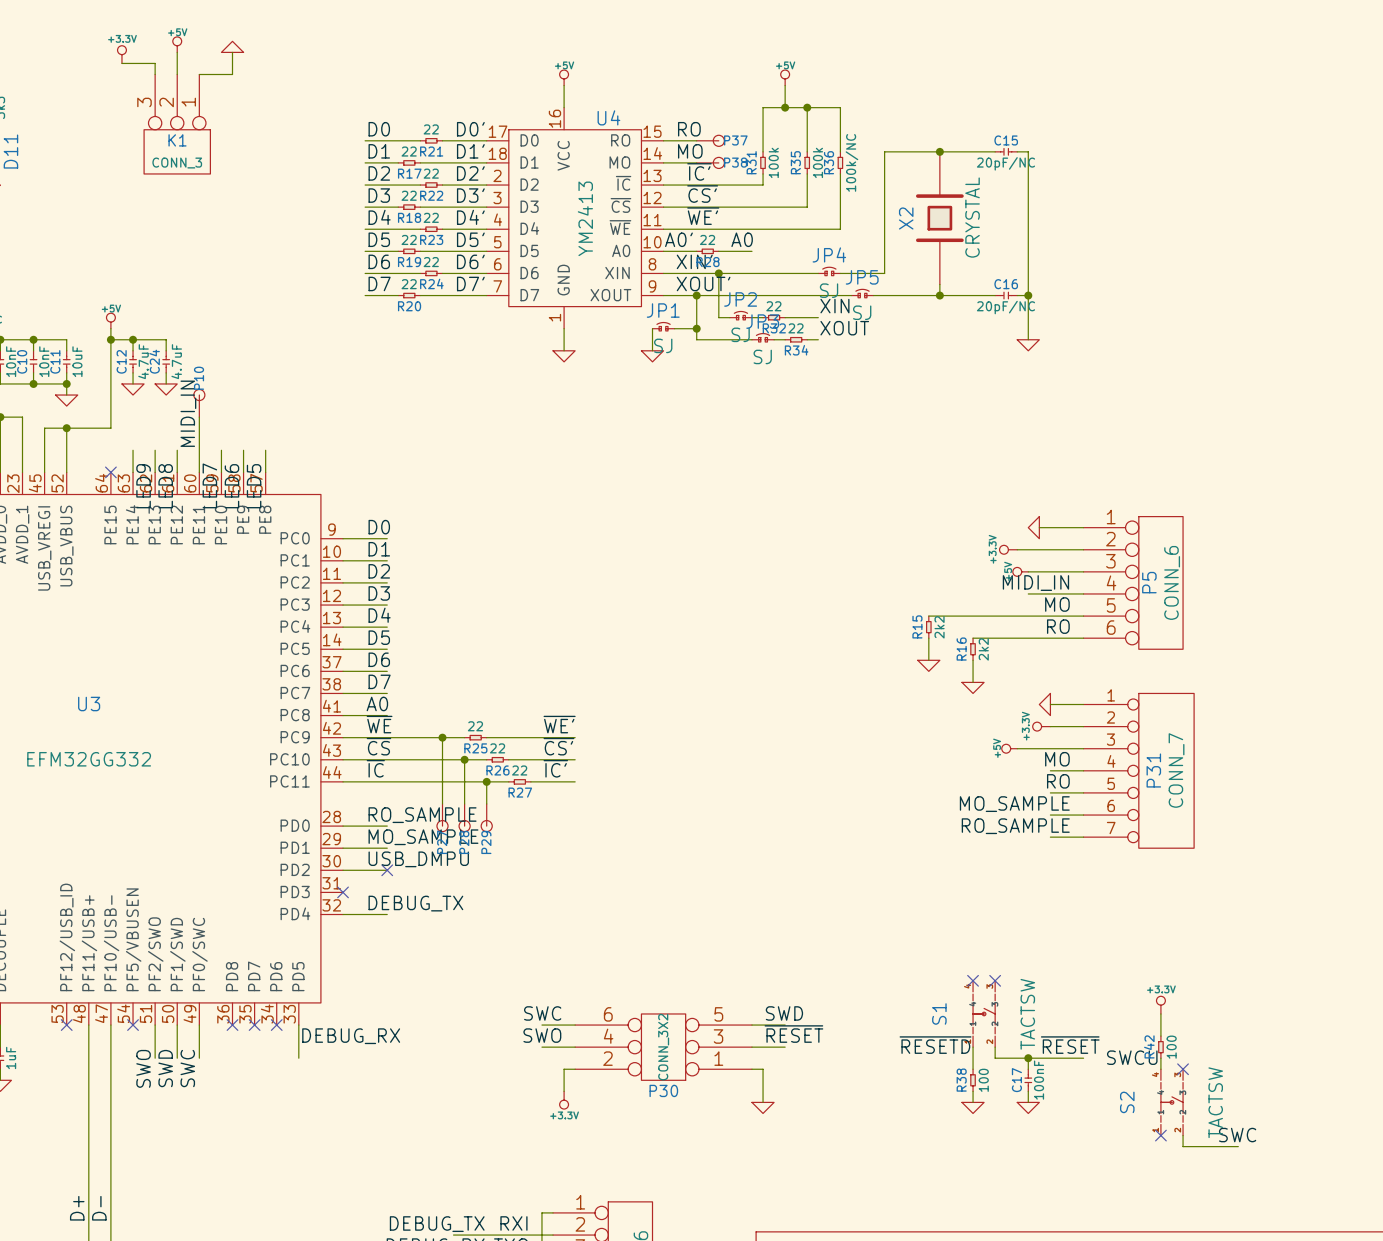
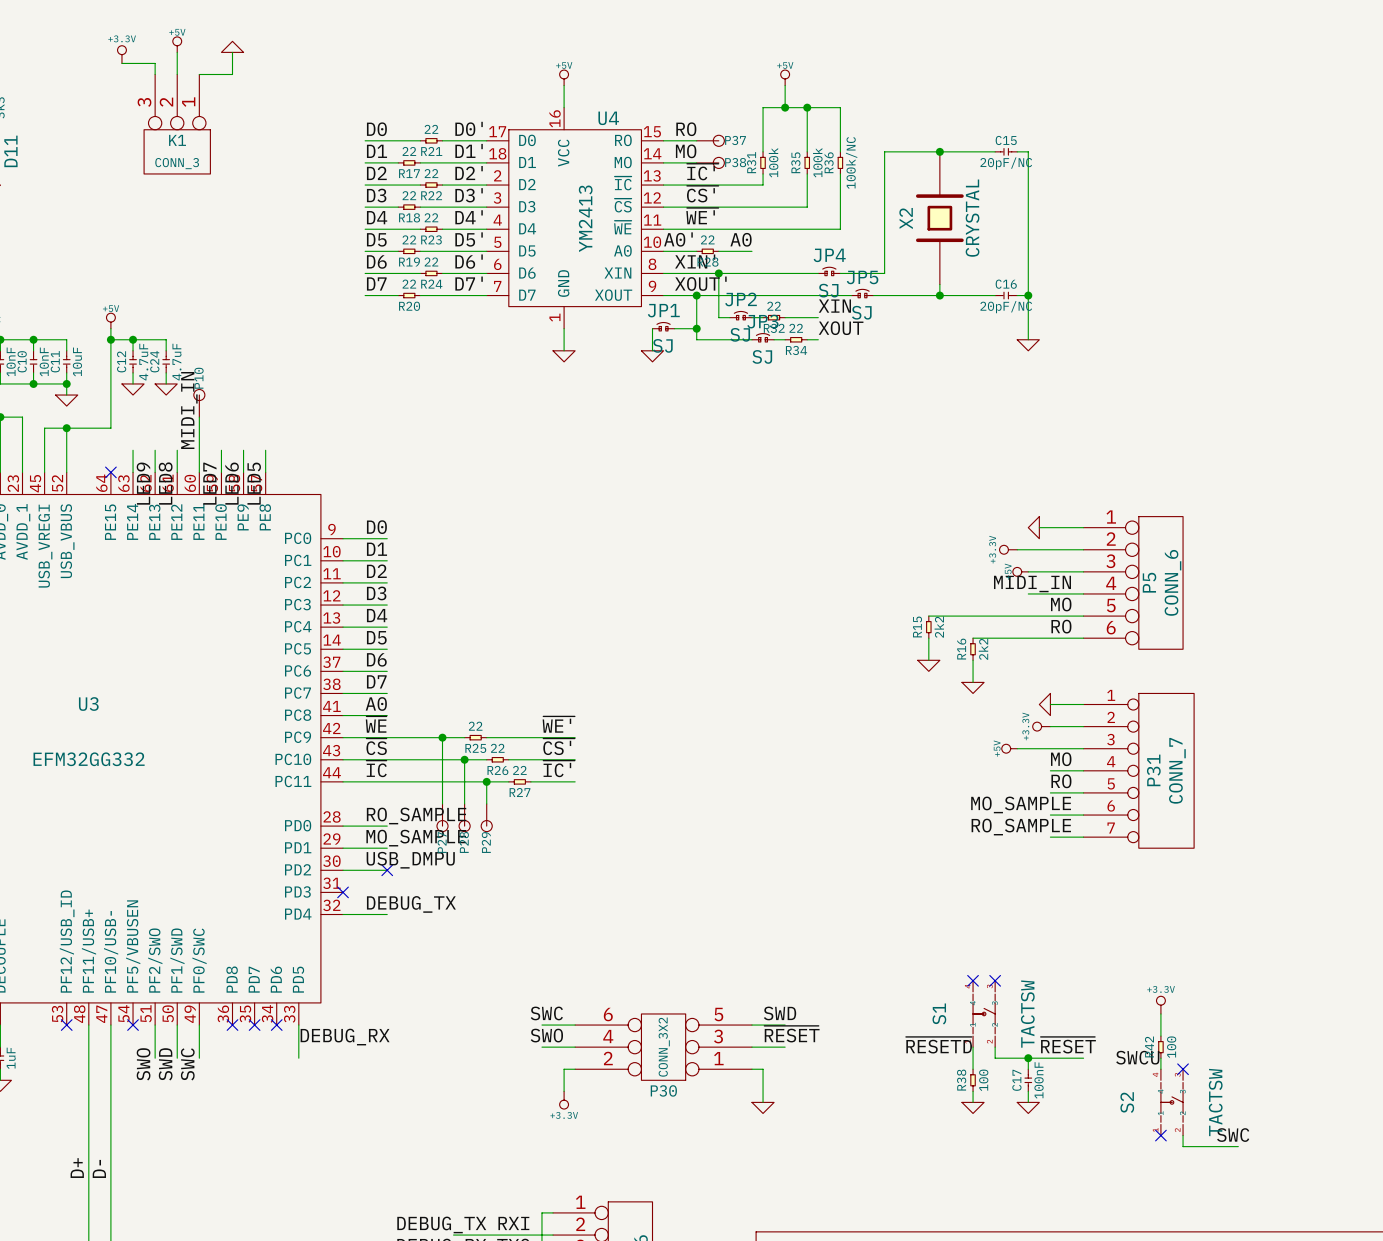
label position: D+ (77, 1208) -> D+ (77, 1168)
label position: D- (99, 1208) -> D- (99, 1168)

